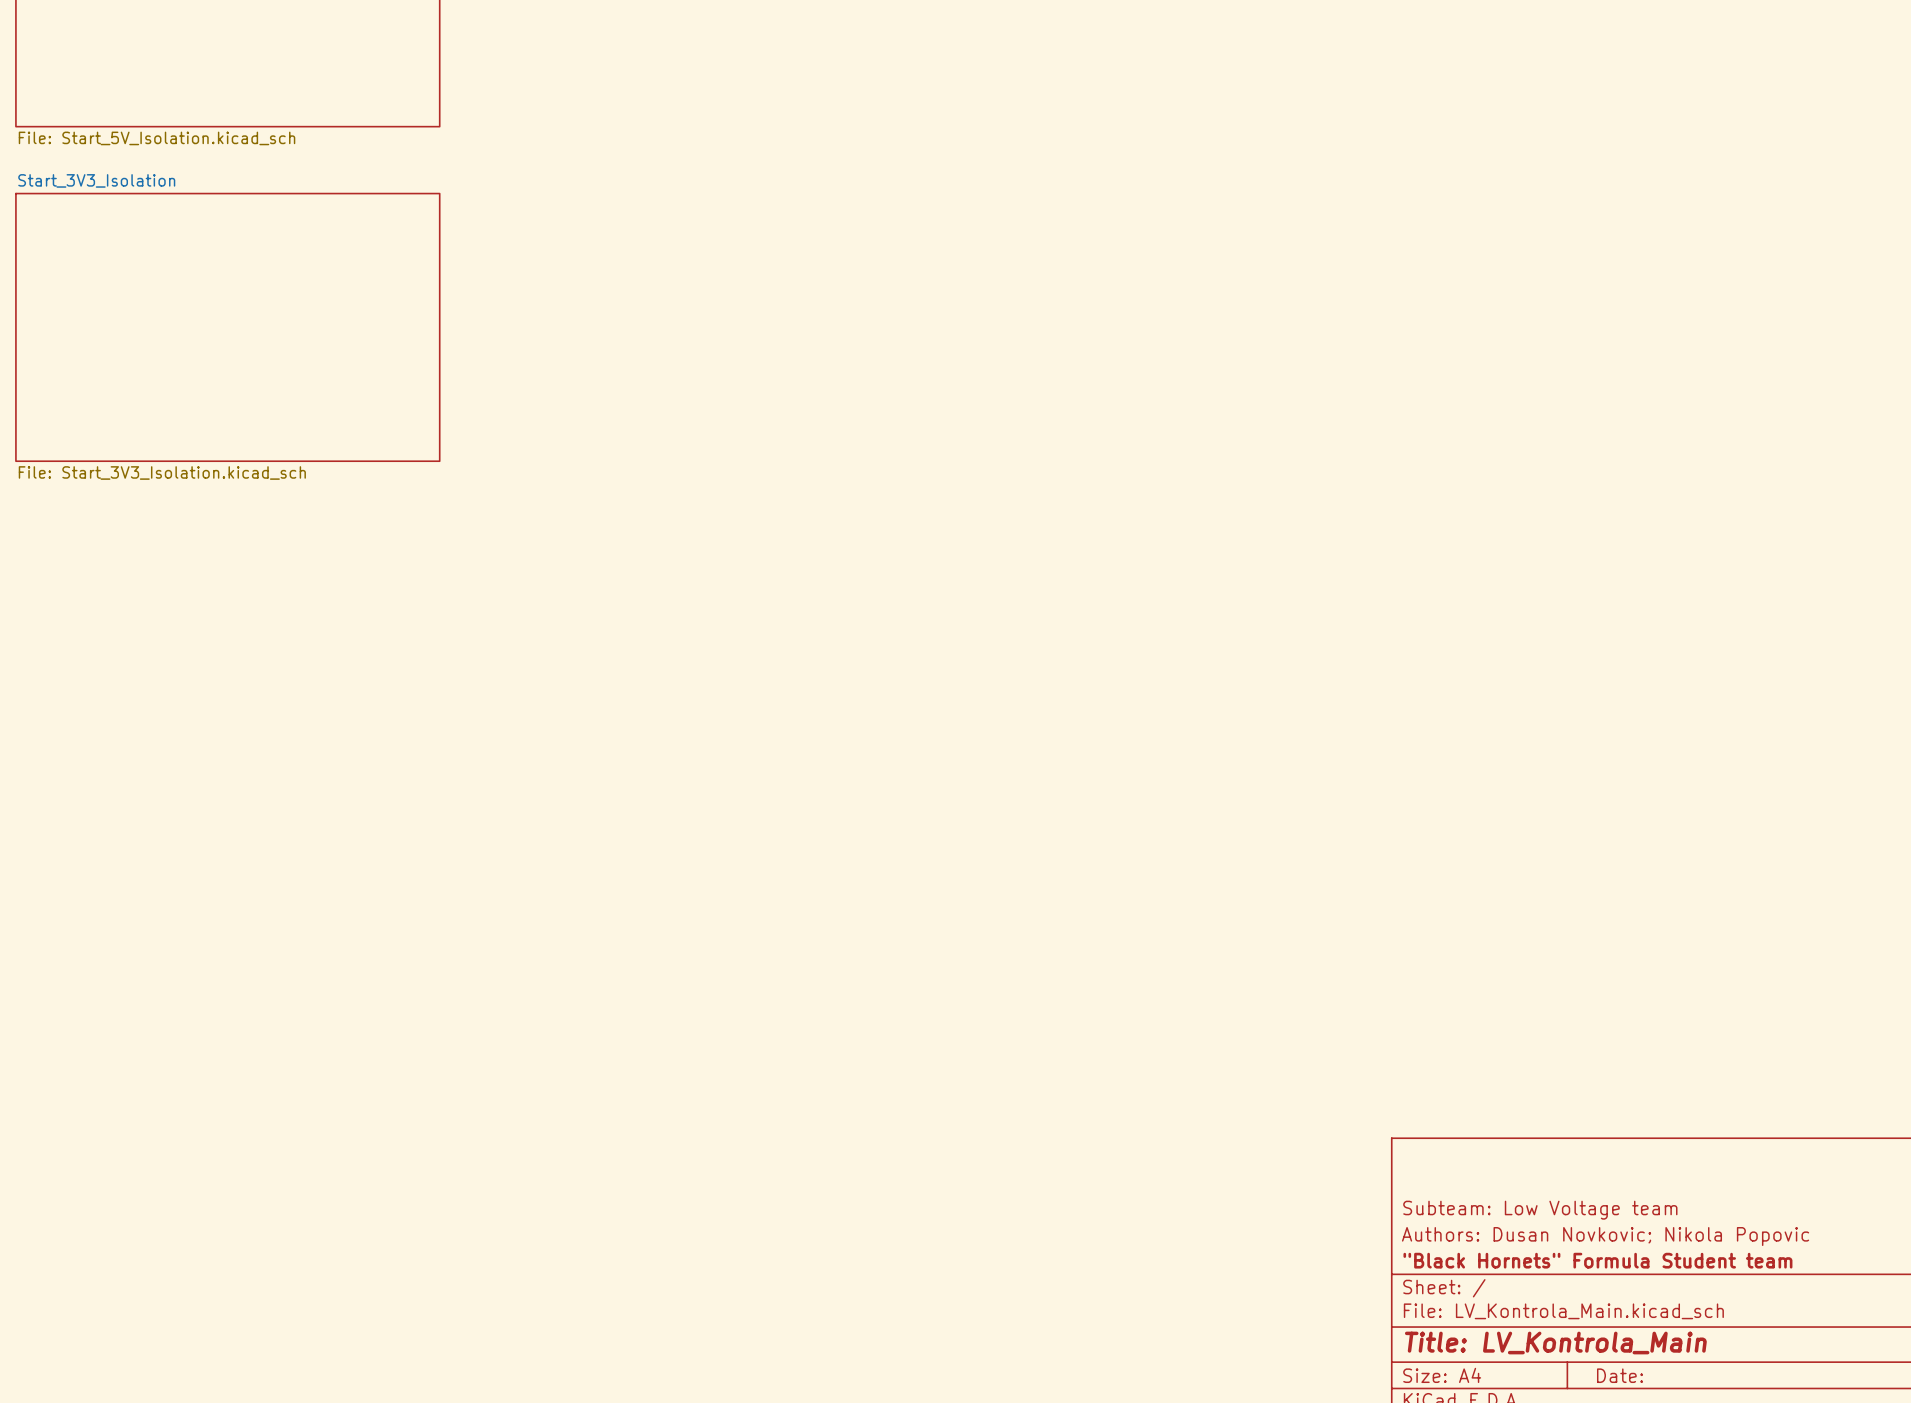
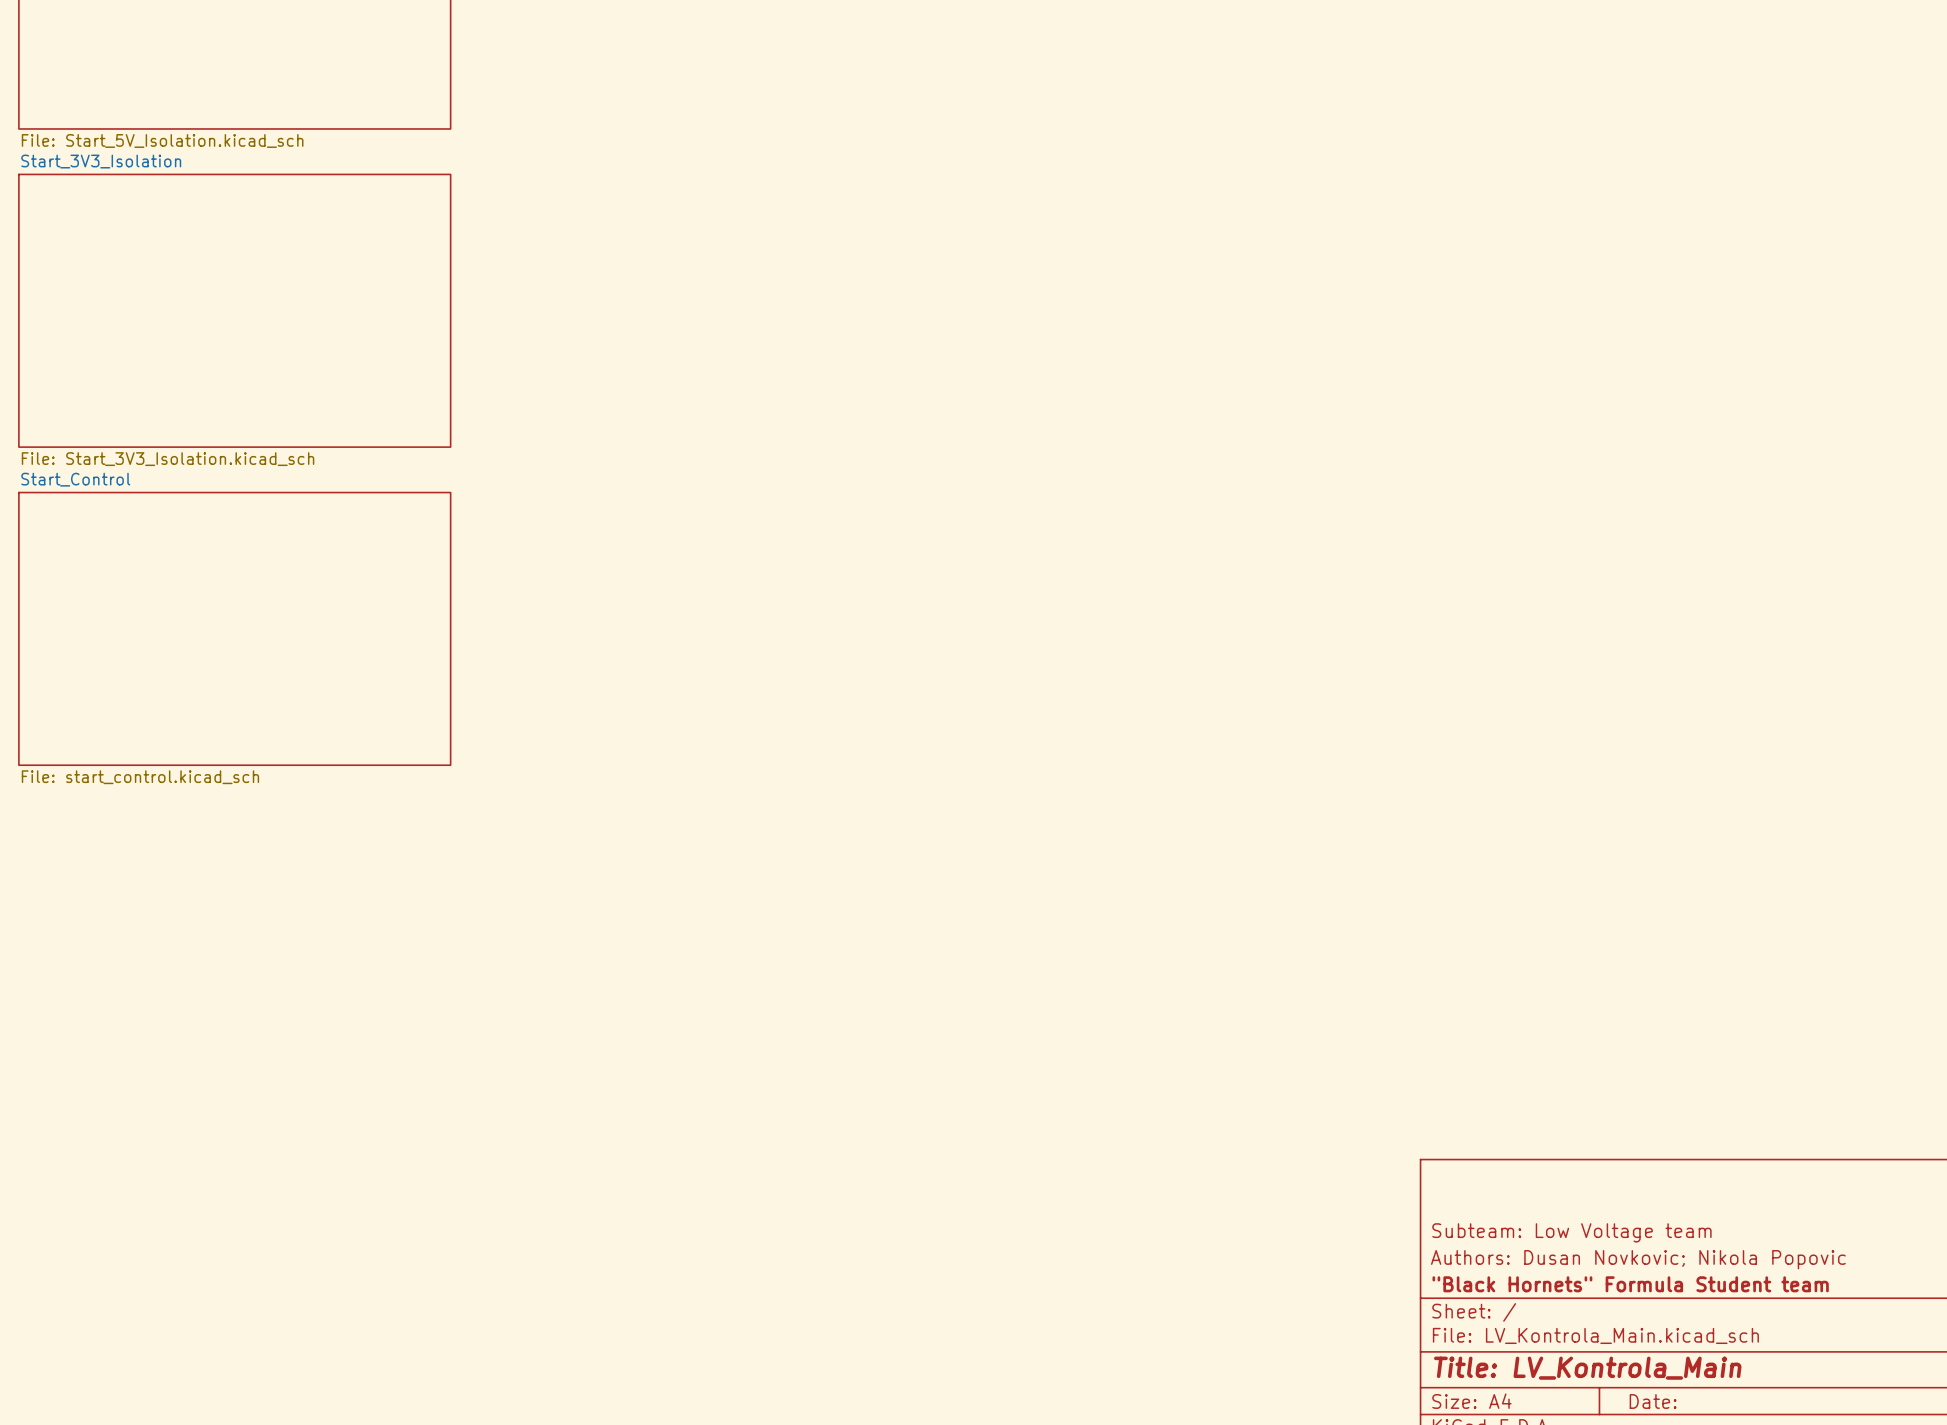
sheet Start_3V3_Isolation position: (227, 327) -> (234, 310)
sheet Start_Control: none -> File: start_control.kicad_sch (234, 628)

